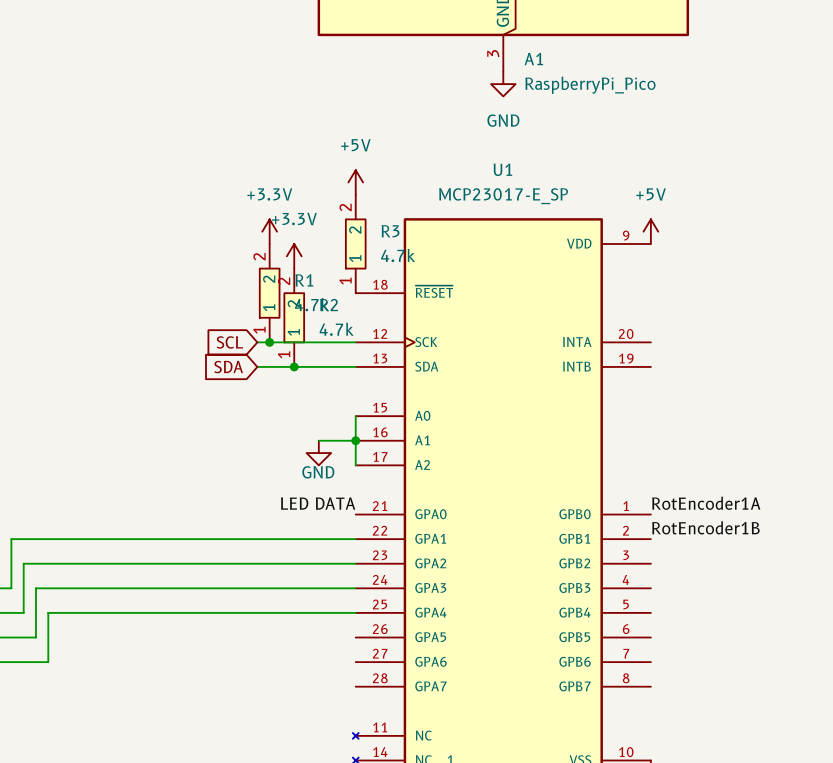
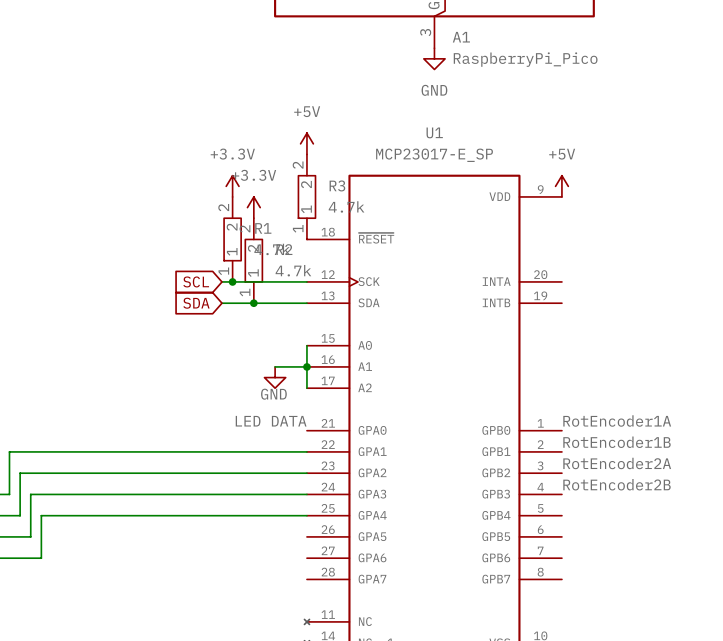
label: none -> RotEncoder2A (617, 463)
label: none -> RotEncoder2B (616, 484)

